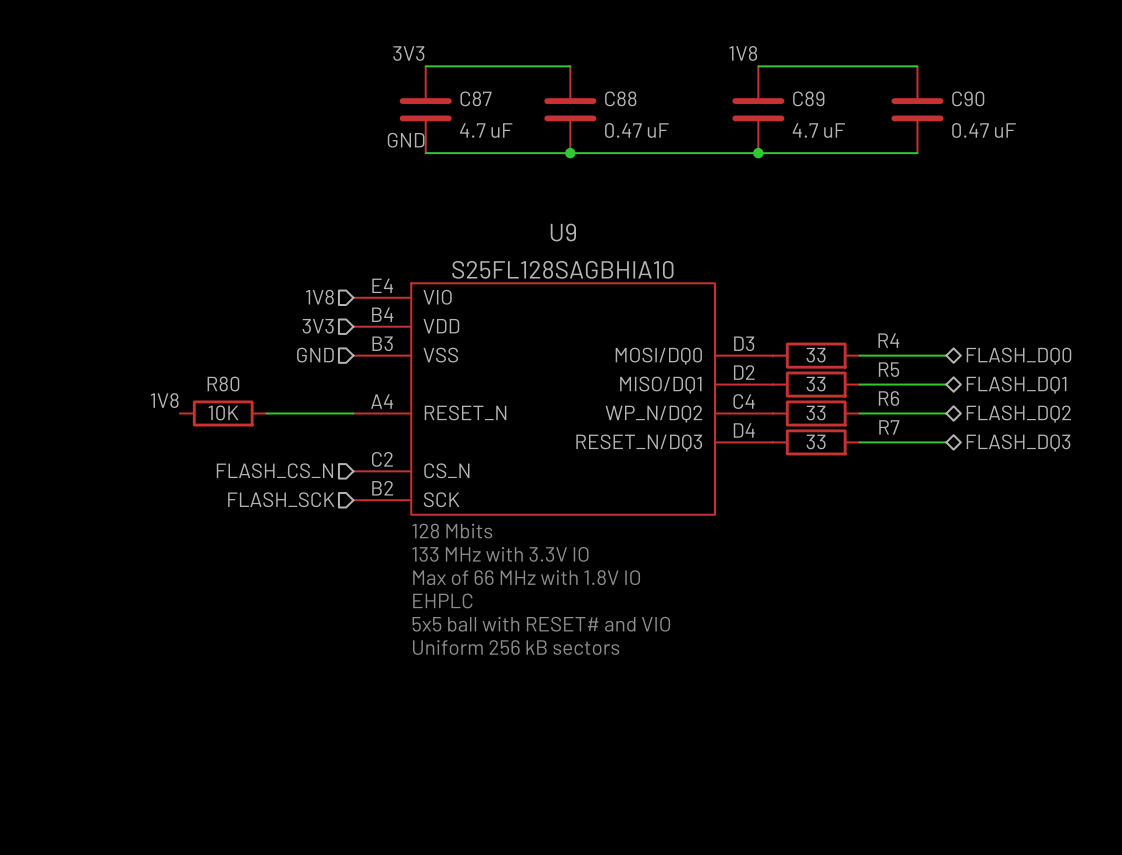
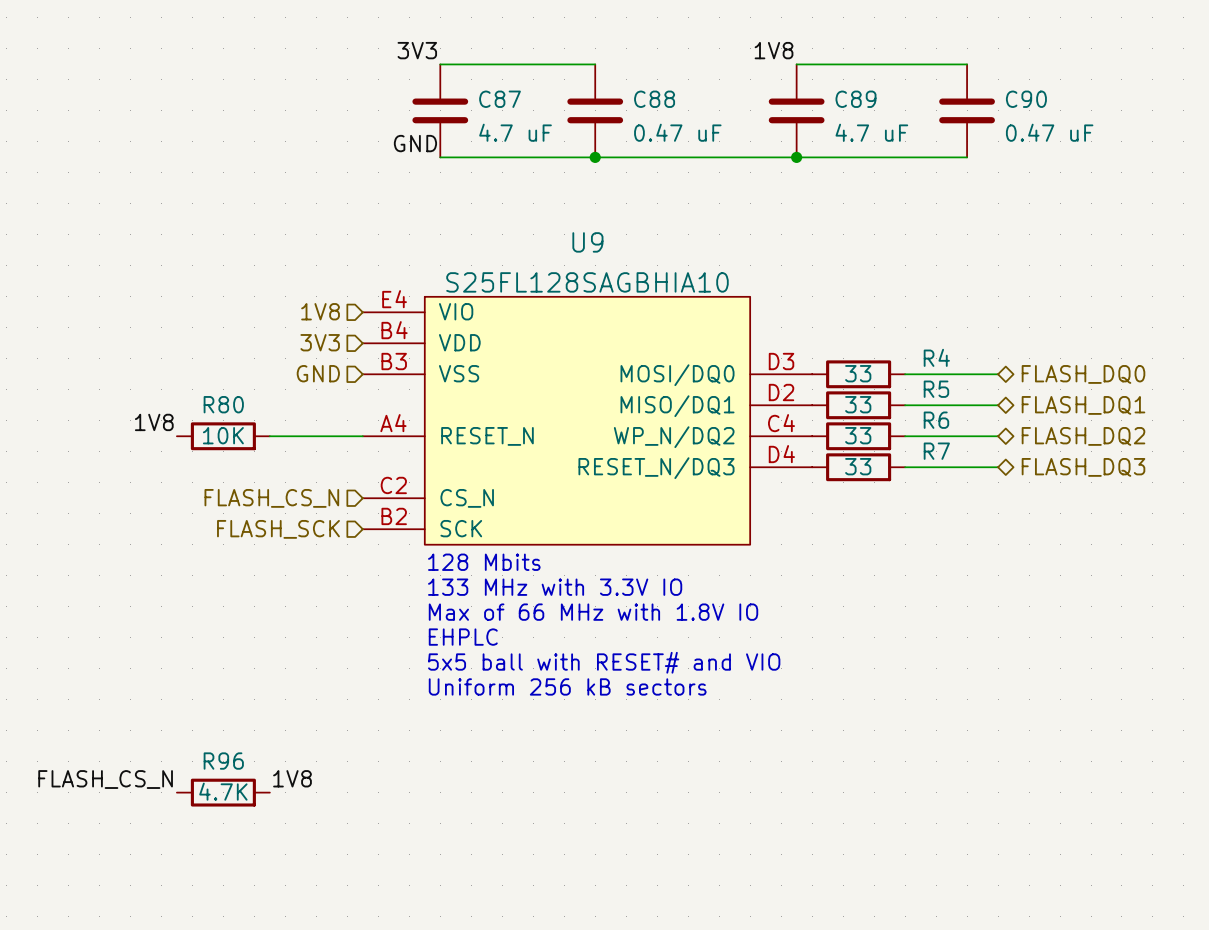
label: none -> FLASH_CS_N (105, 779)
label: none -> 1V8 (292, 778)
R96: none -> 4.7K (223, 792)

